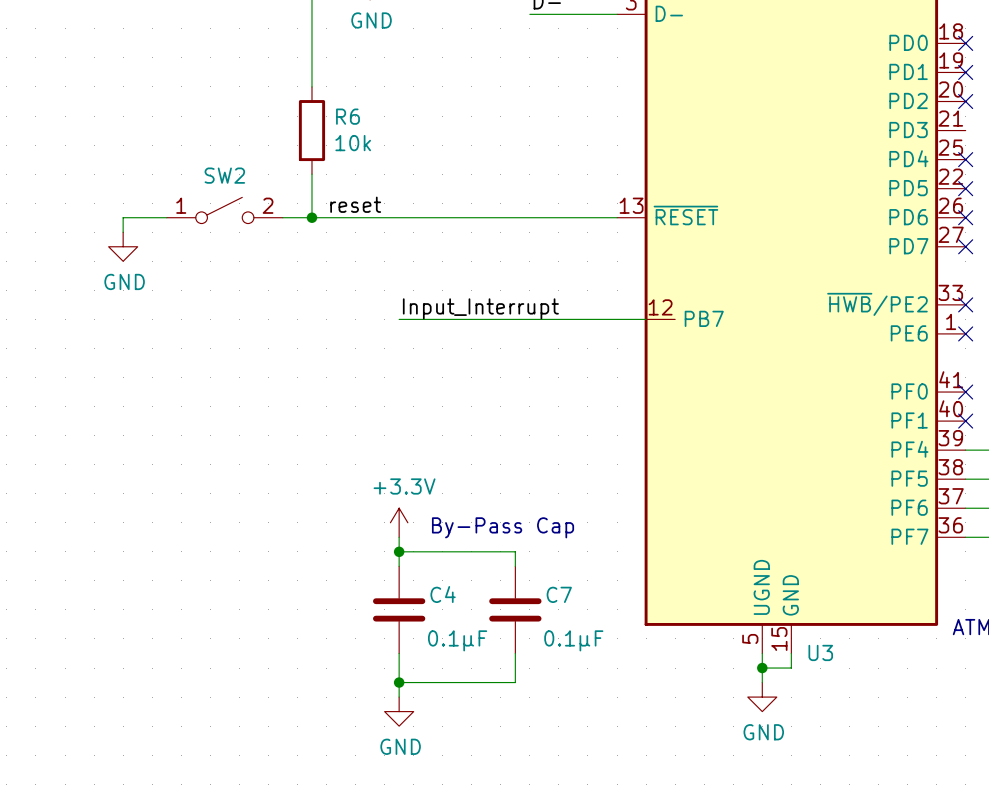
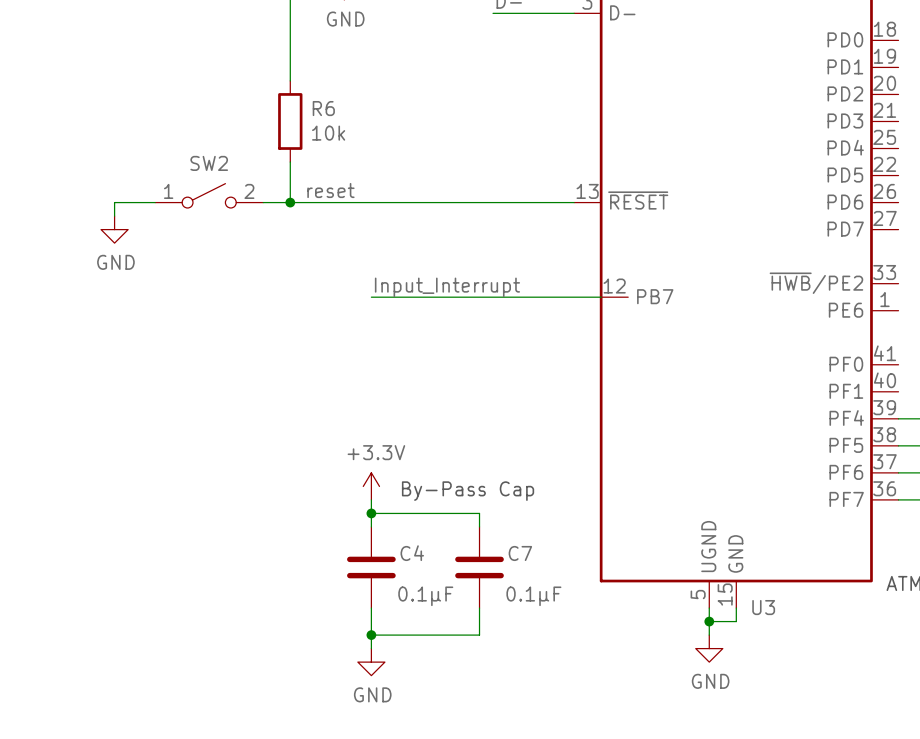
no-connect mark: (965, 43) -> none
no-connect mark: (965, 72) -> none
no-connect mark: (965, 101) -> none
no-connect mark: (965, 159) -> none
no-connect mark: (965, 188) -> none
no-connect mark: (965, 217) -> none
no-connect mark: (965, 246) -> none
no-connect mark: (965, 304) -> none
no-connect mark: (965, 333) -> none
no-connect mark: (965, 392) -> none
no-connect mark: (965, 421) -> none

